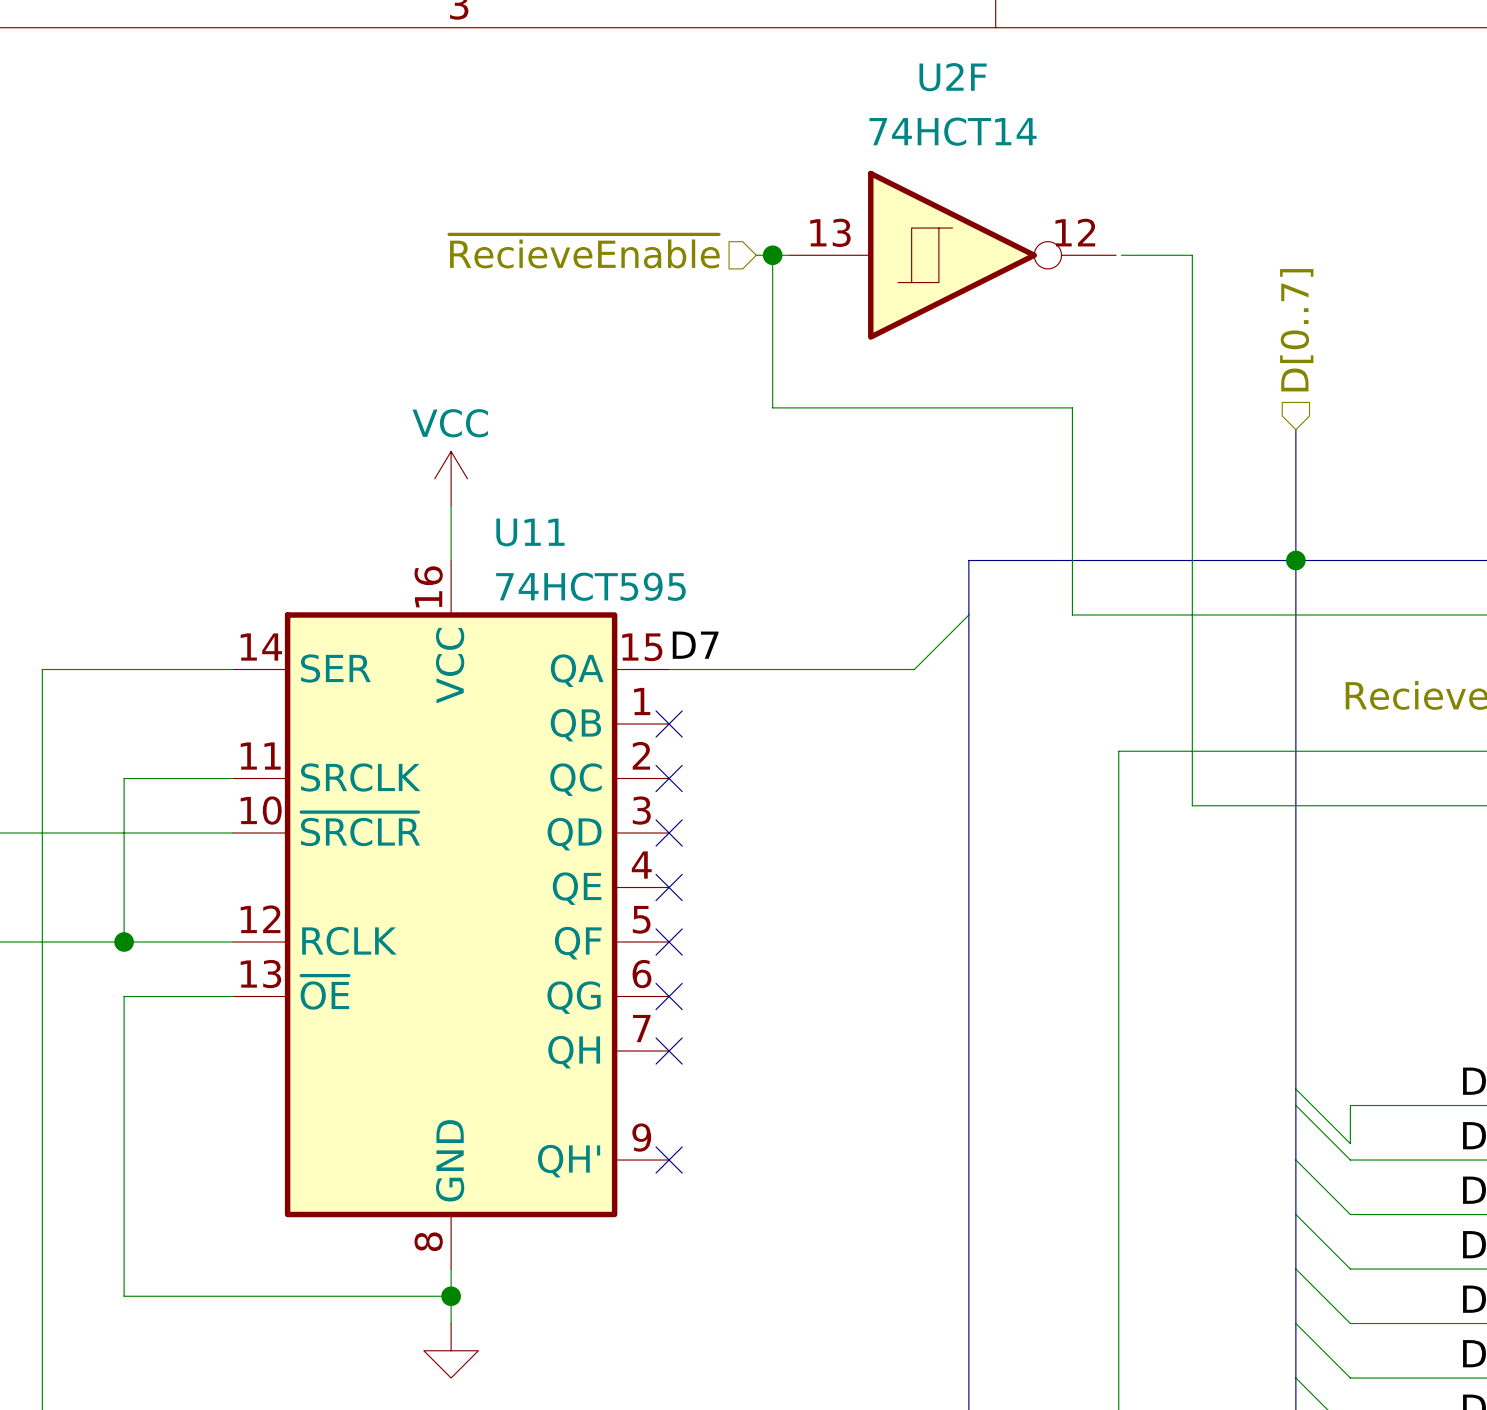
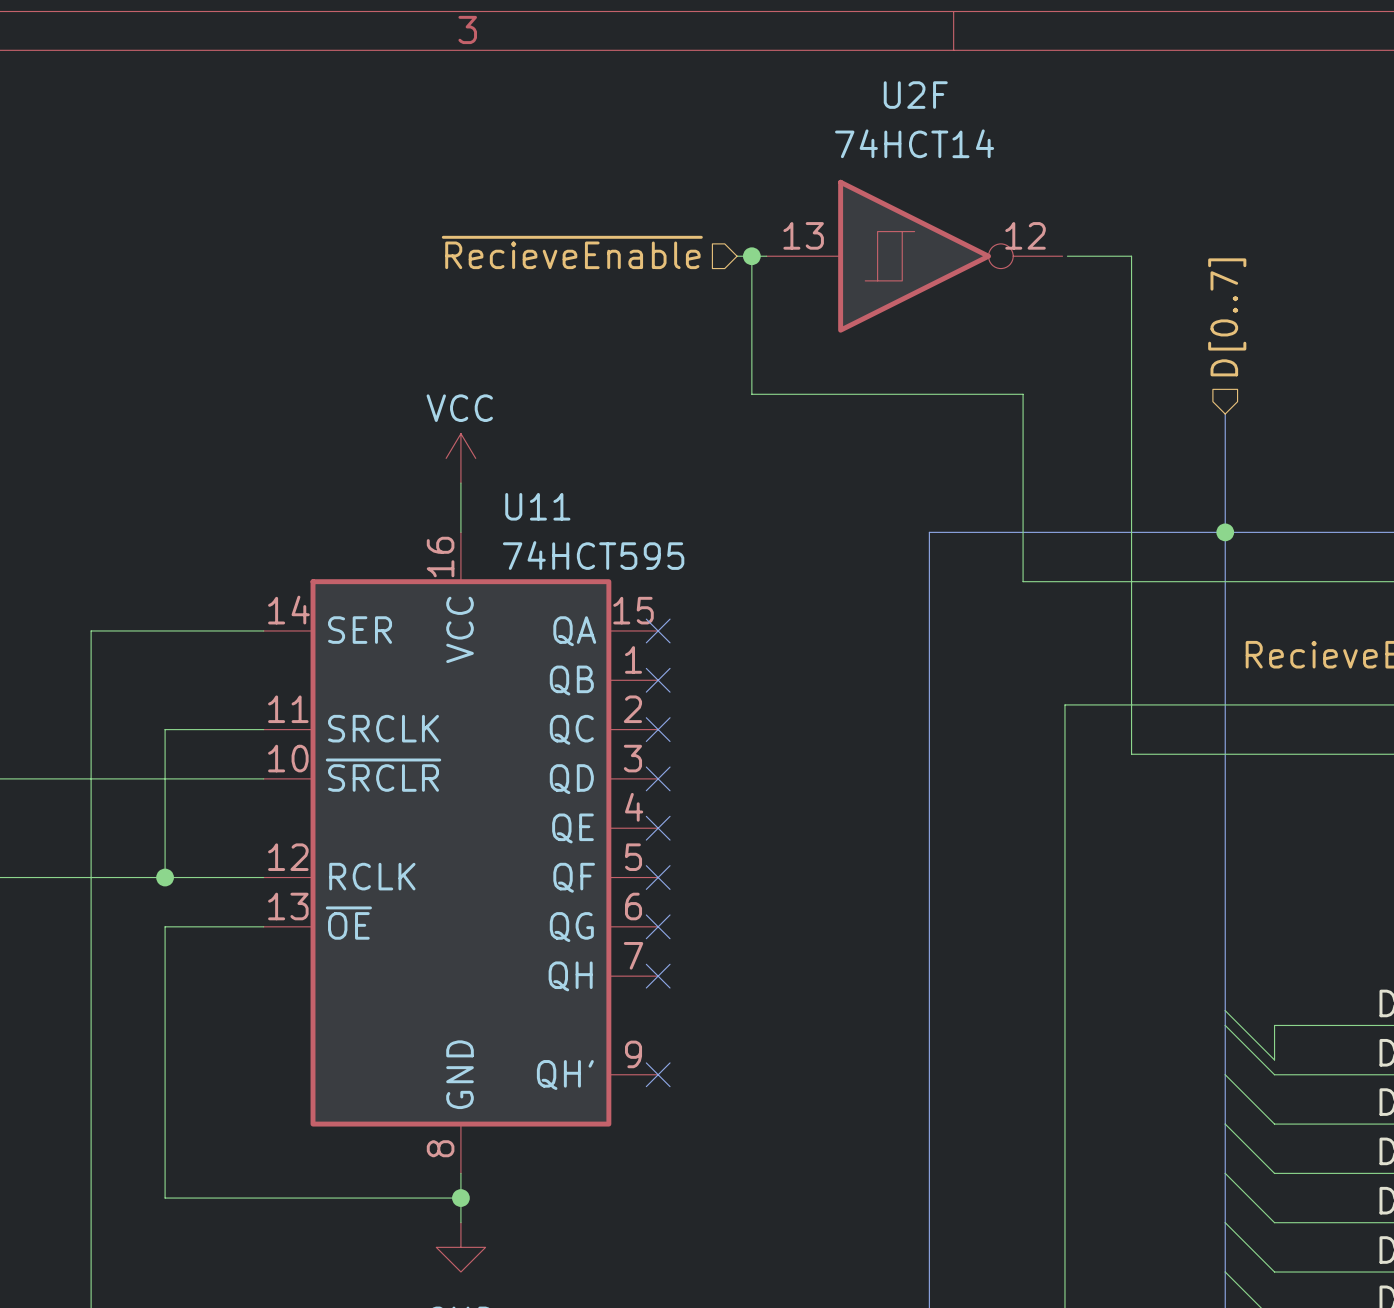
wire: (968, 615) (914, 669) (669, 669) -> none
label: D7 (695, 645) -> none
no-connect mark: none -> (658, 630)

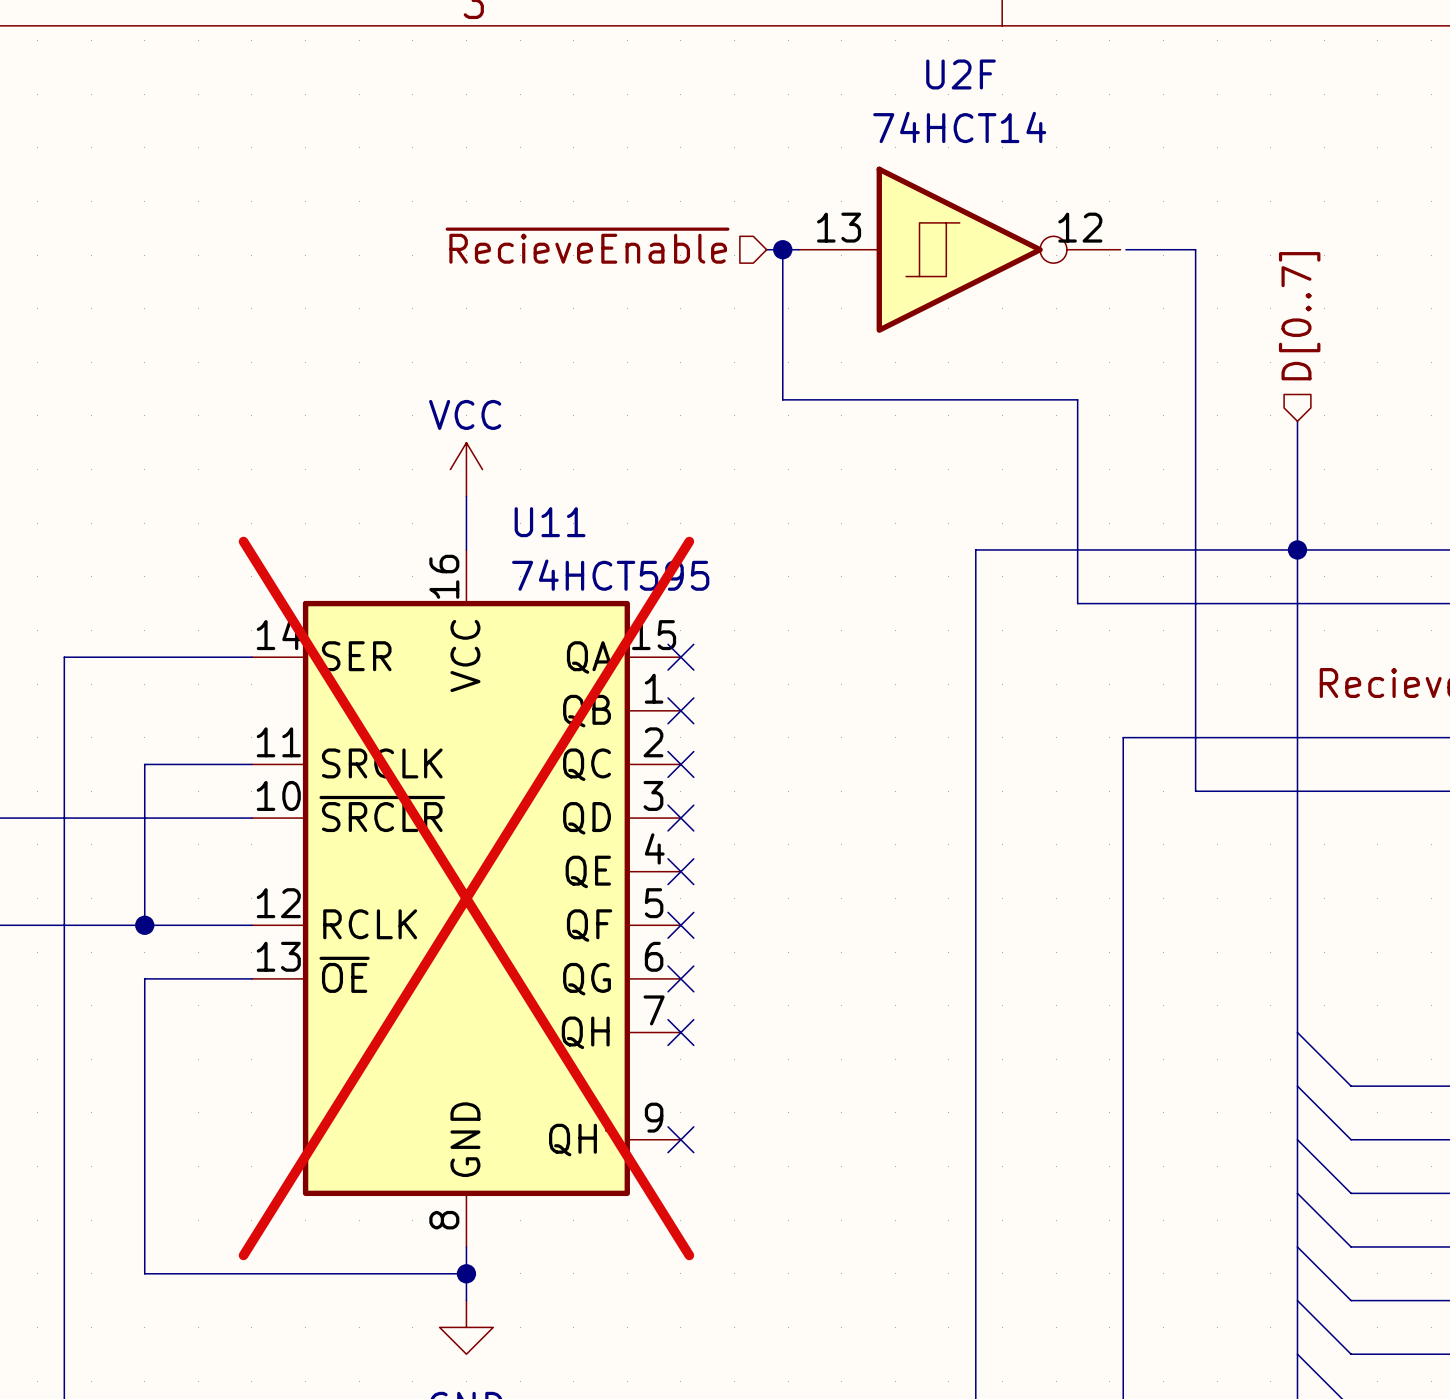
U11 do-not-place cross: none -> (466, 898)
wire: (1225, 1010) (1274, 1059) (1274, 1025) -> (1297, 1032) (1351, 1086)

